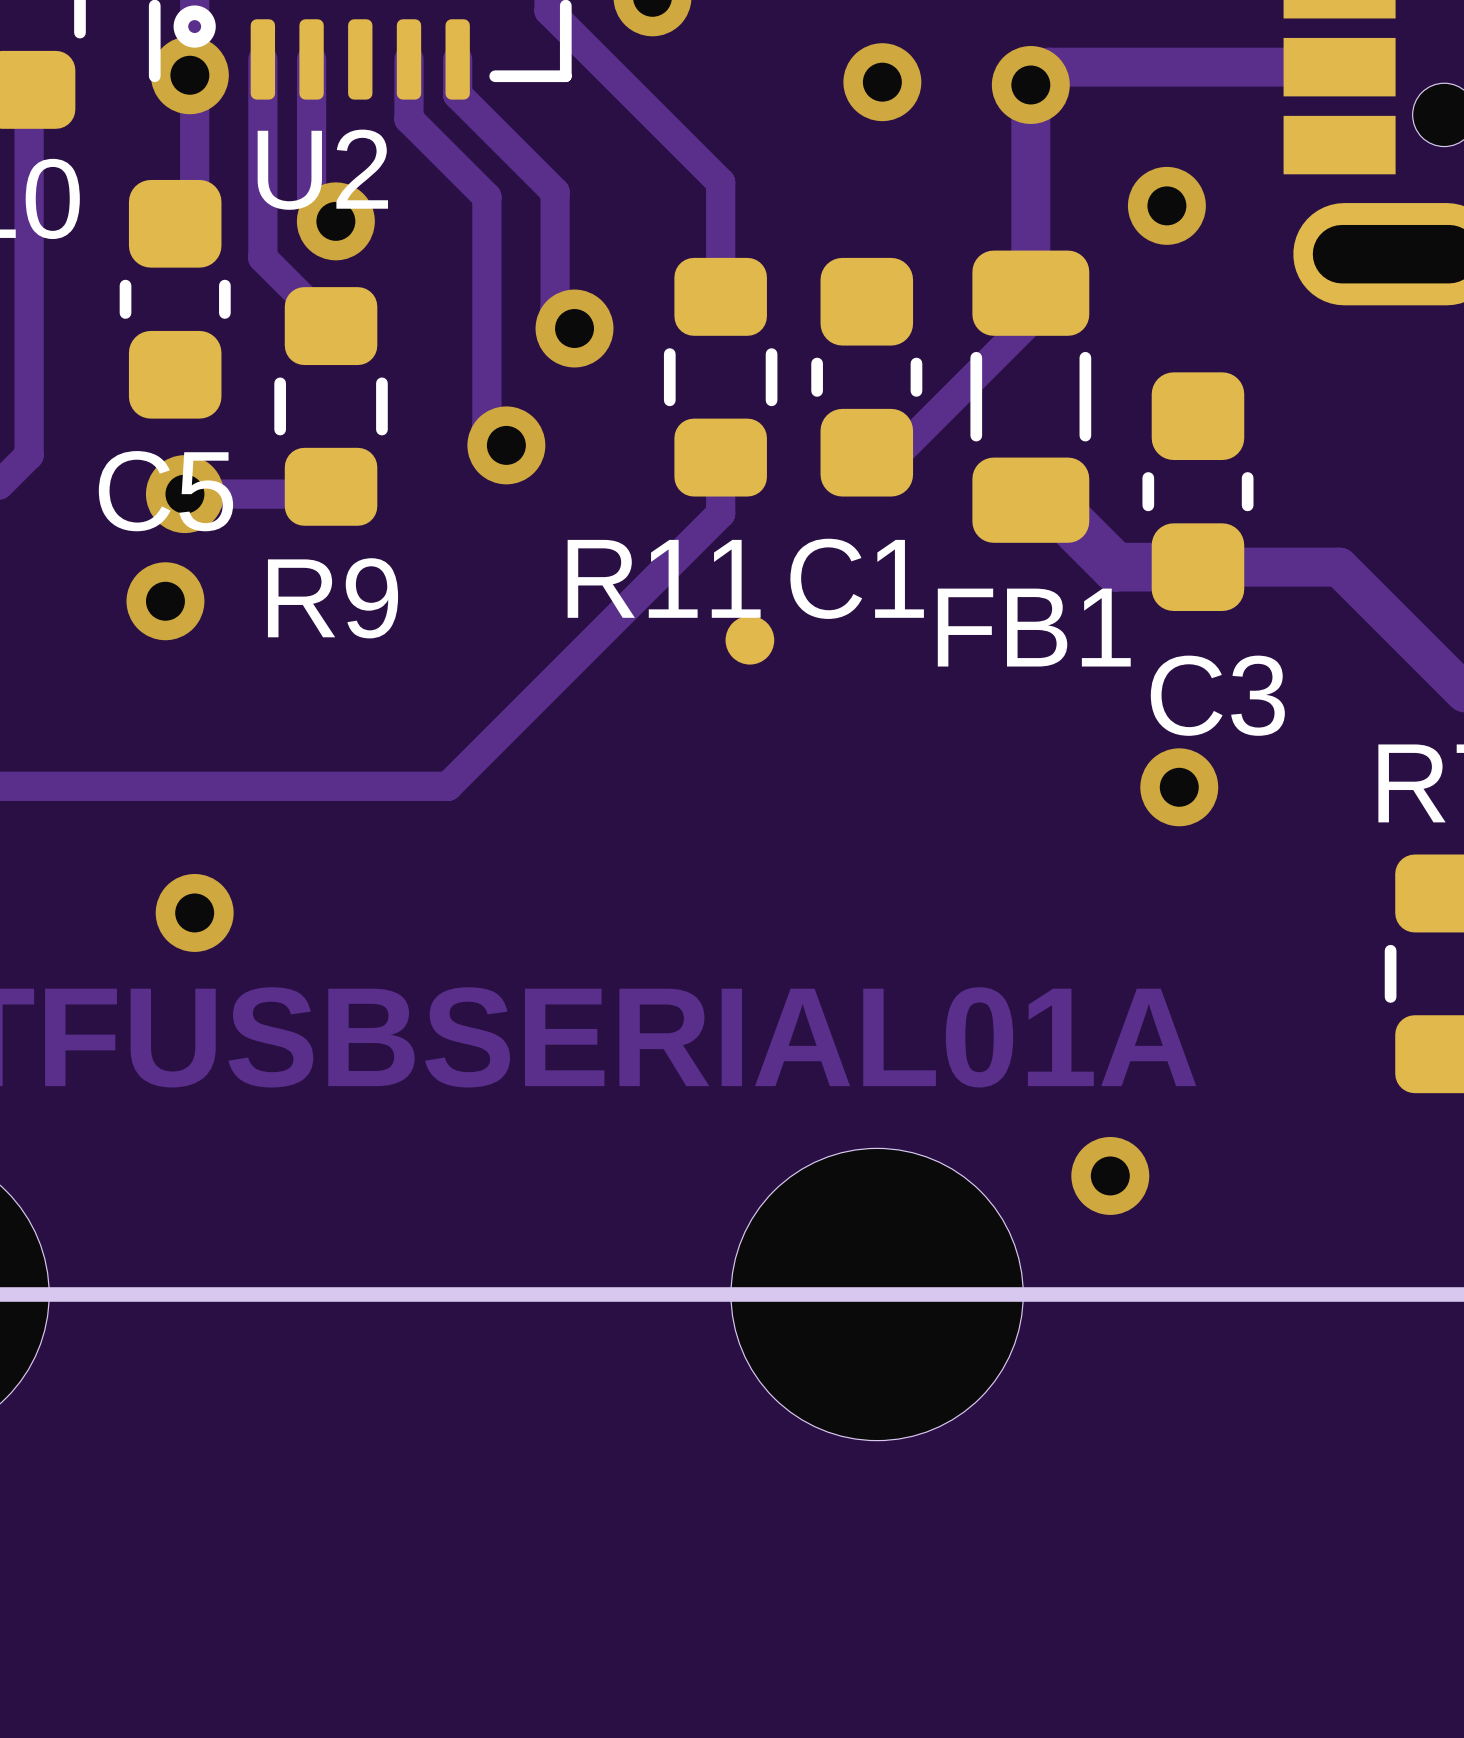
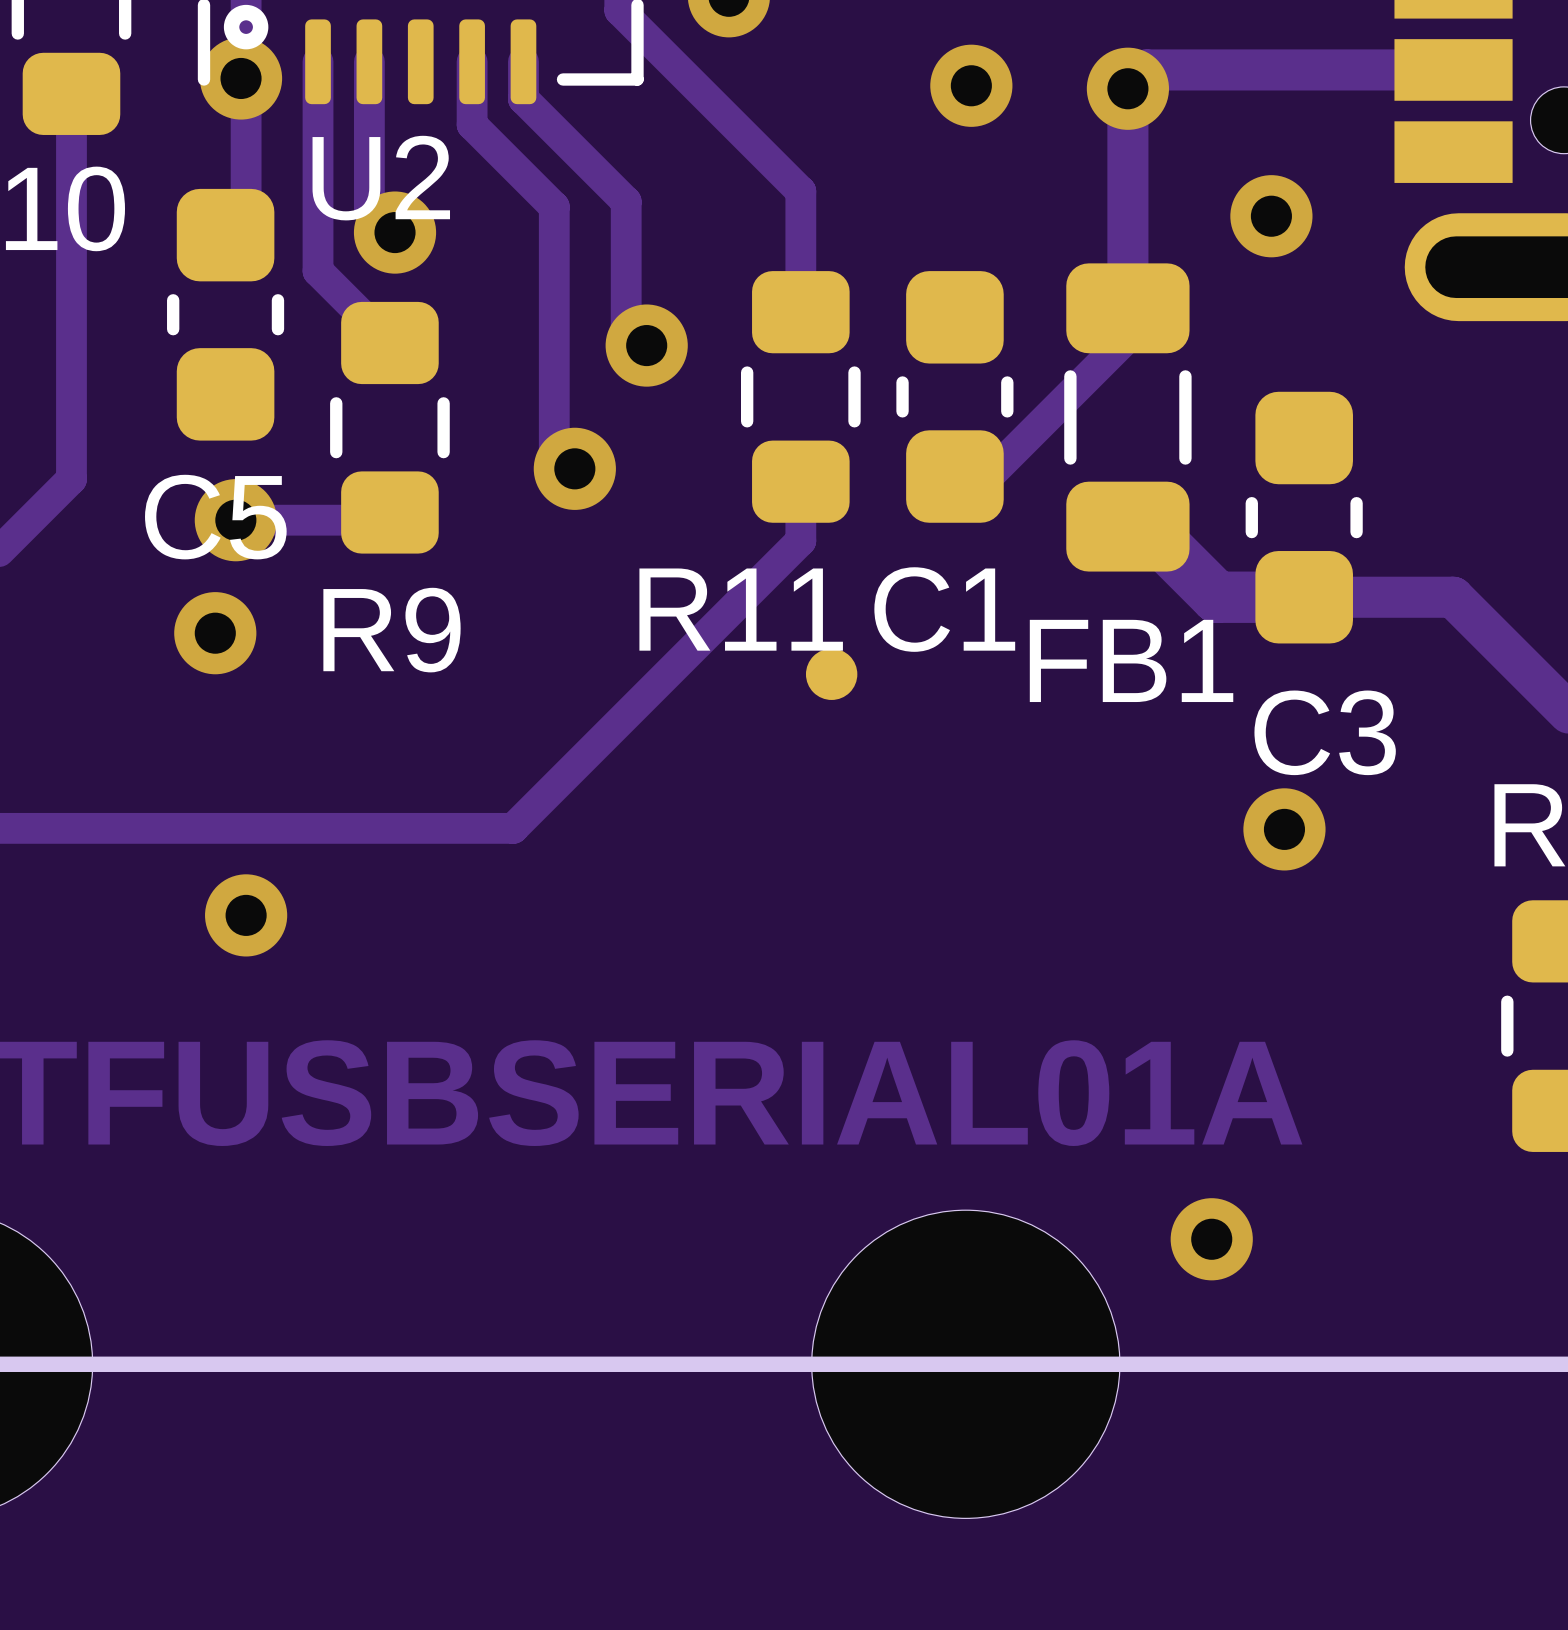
via position: (194, 912) -> (246, 915)

